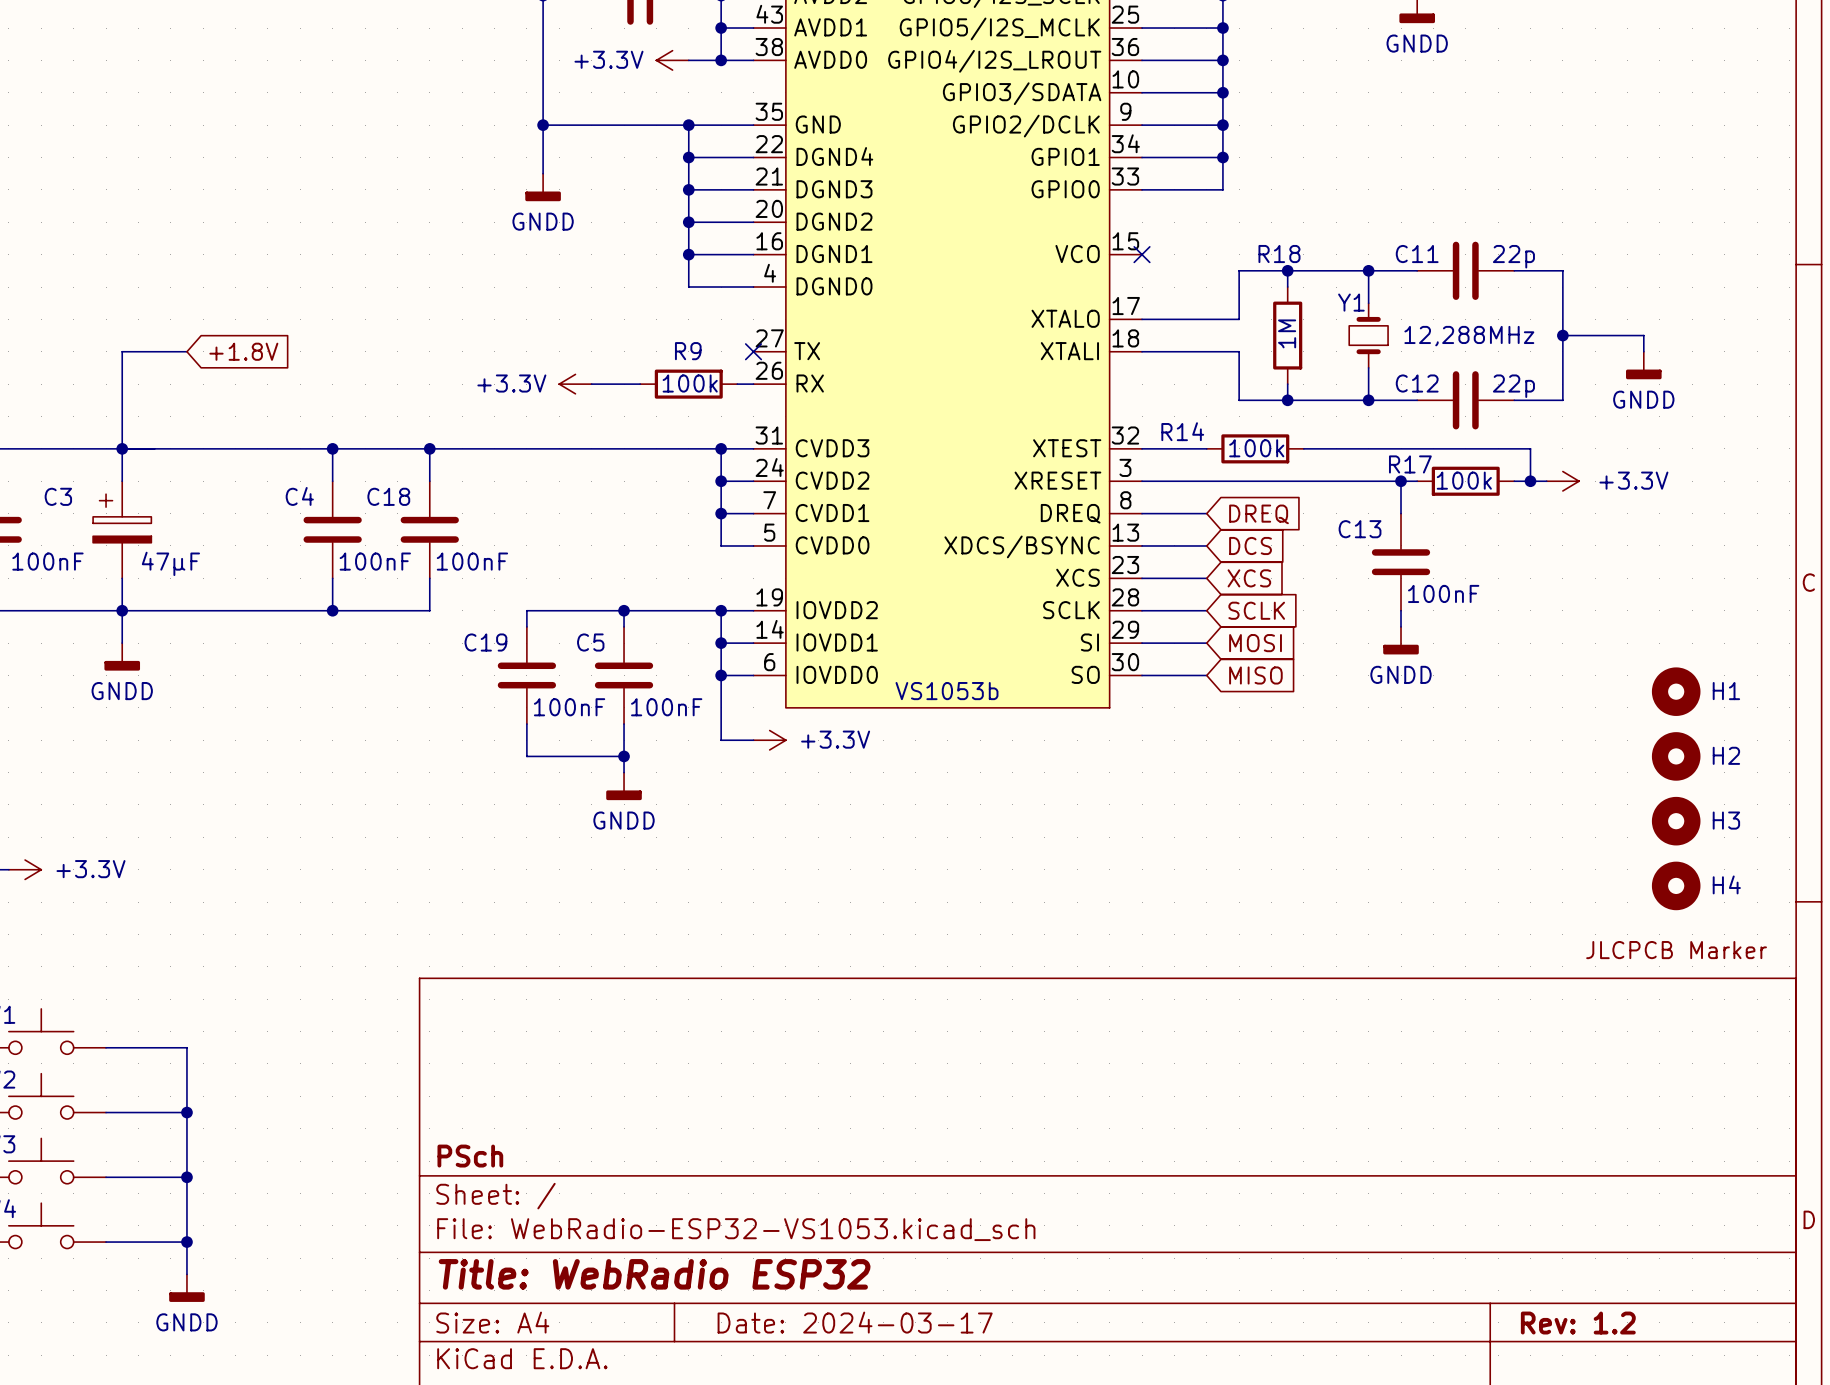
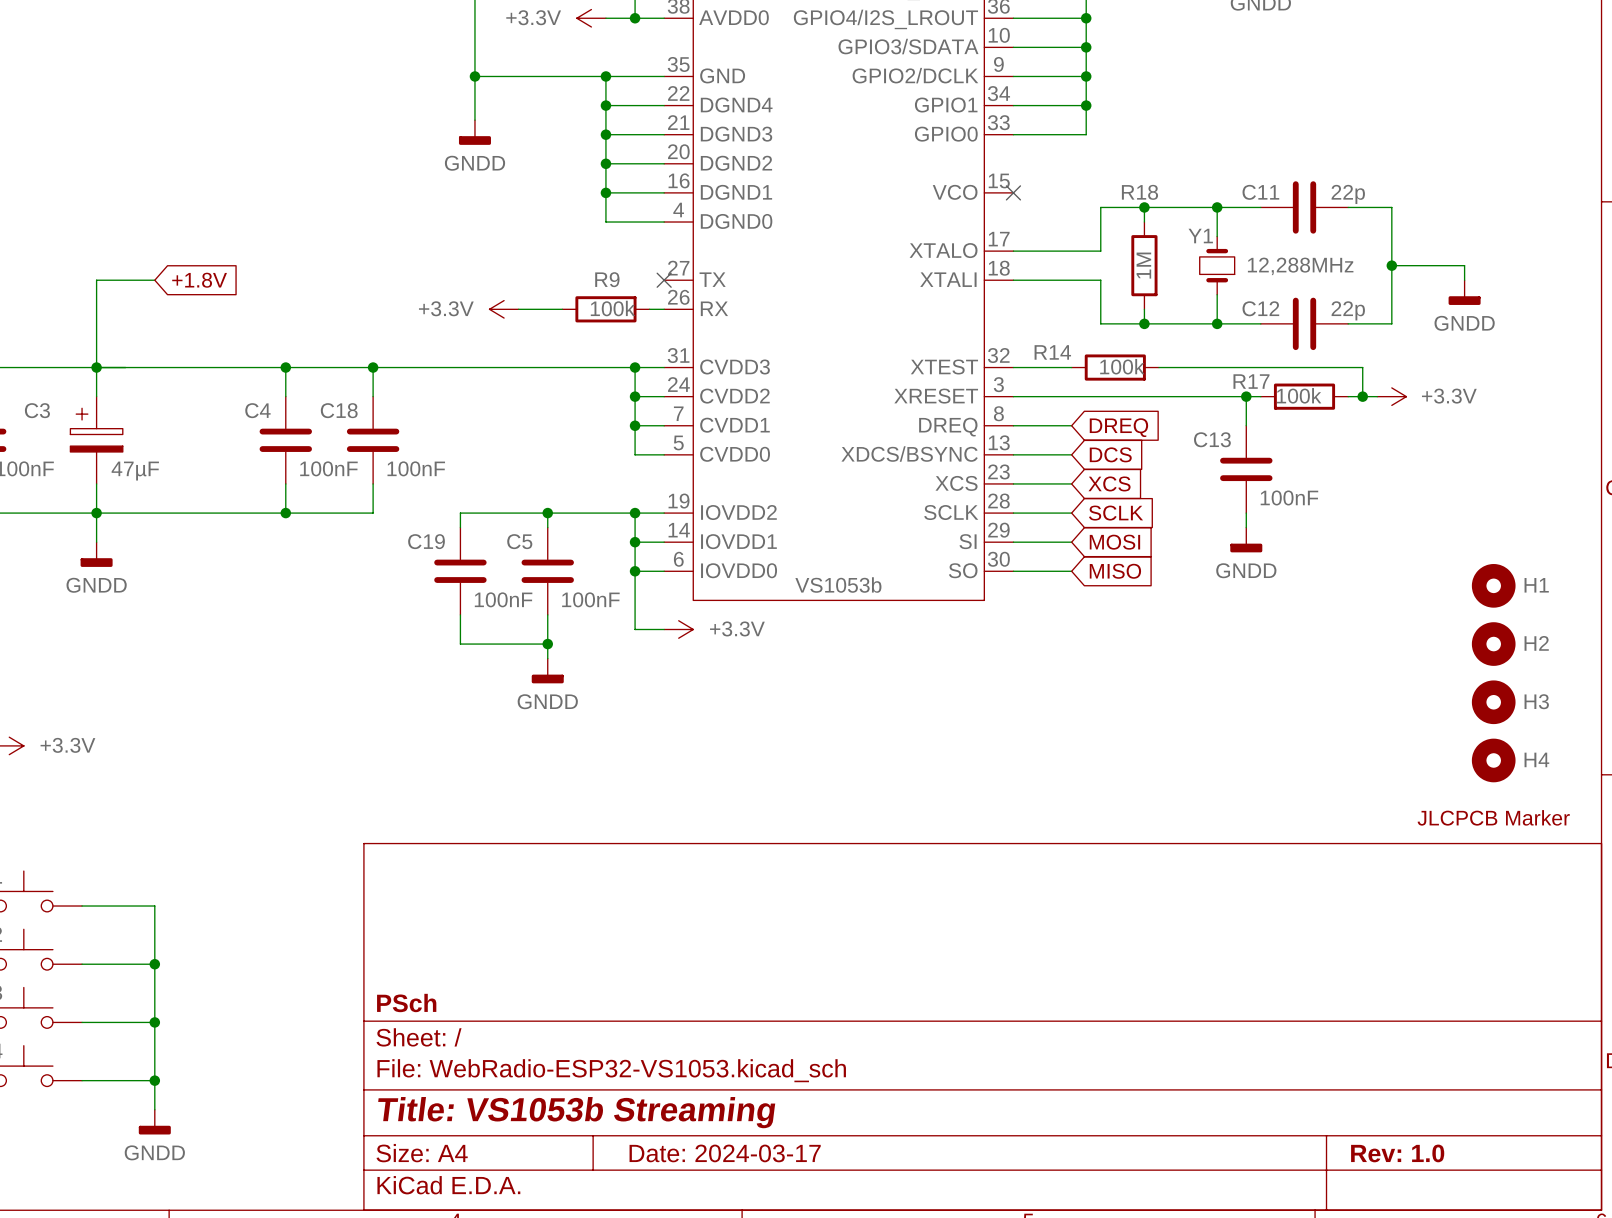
title block: Title: WebRadio ESP32 (654, 1274) -> Title: VS1053b Streaming (576, 1112)
title block: Rev: 1.2 (1578, 1323) -> Rev: 1.0 (1397, 1153)

